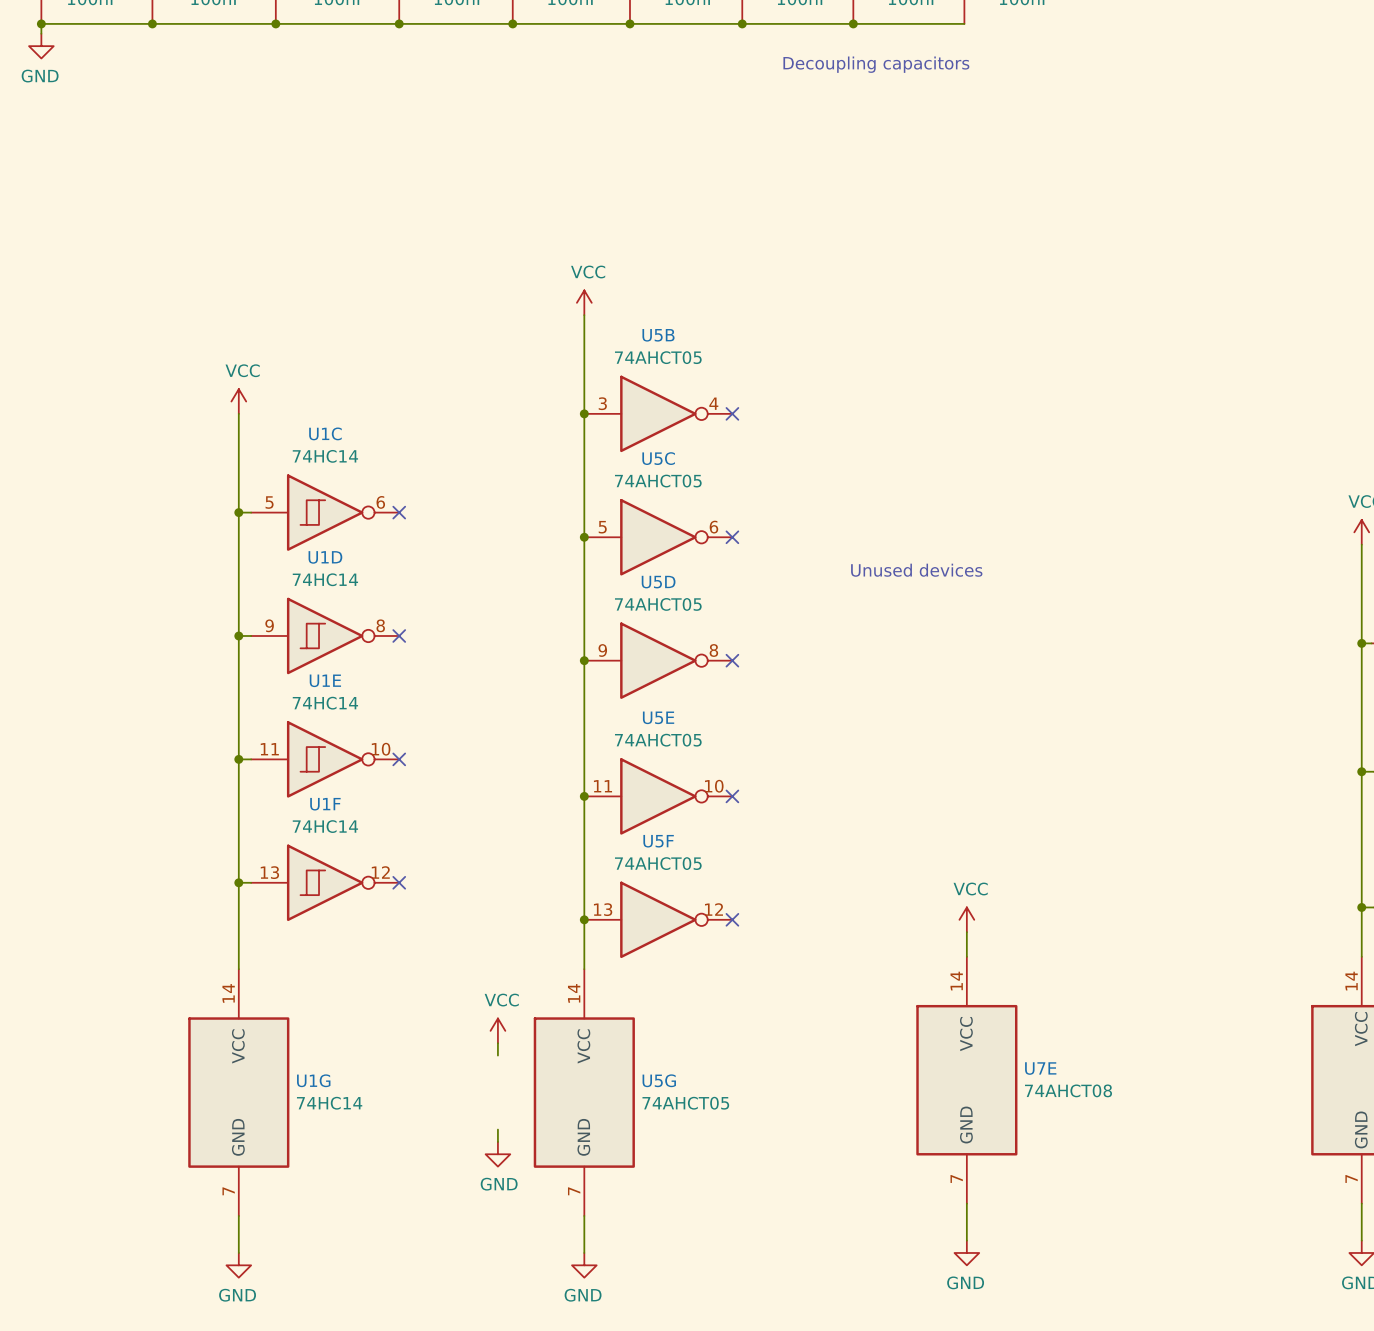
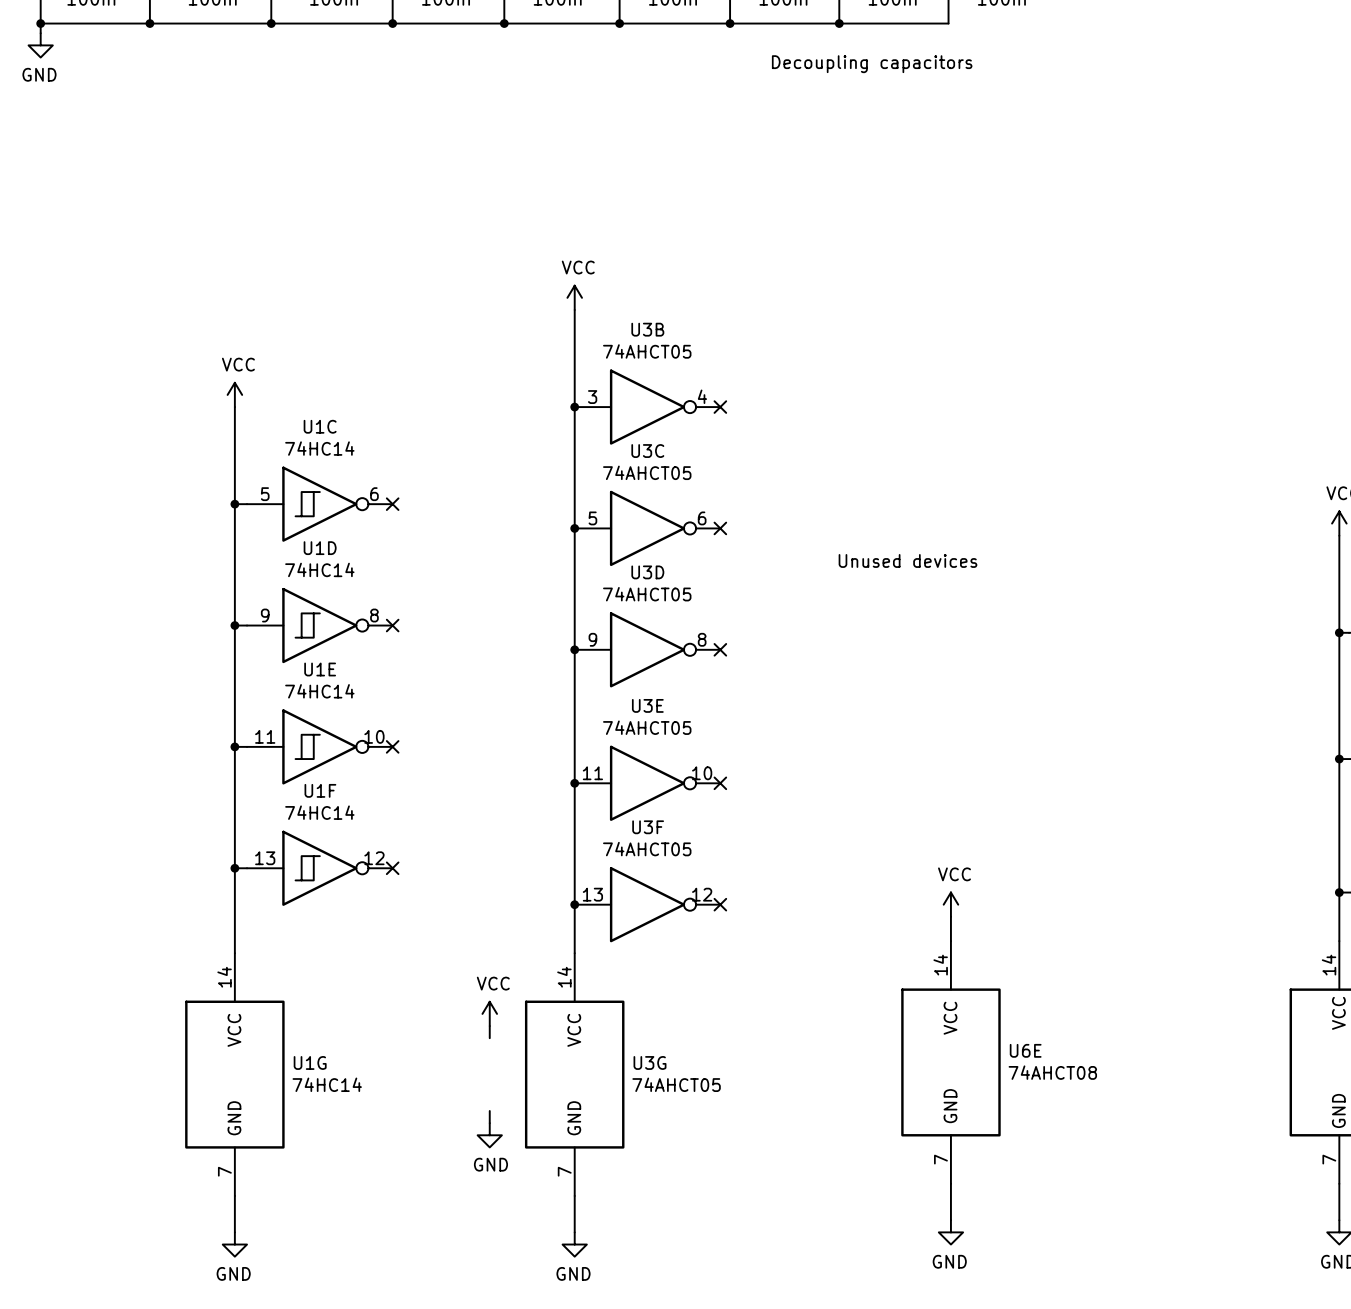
U5B name: U5B (658, 335) -> U3B (647, 329)
U5C name: U5C (658, 458) -> U3C (647, 451)
U5D name: U5D (658, 582) -> U3D (647, 572)
U5E name: U5E (658, 717) -> U3E (647, 705)
U5F name: U5F (658, 841) -> U3F (648, 827)
U7E name: U7E (1040, 1068) -> U6E (1025, 1050)
U5G name: U5G (659, 1080) -> U3G (650, 1062)

